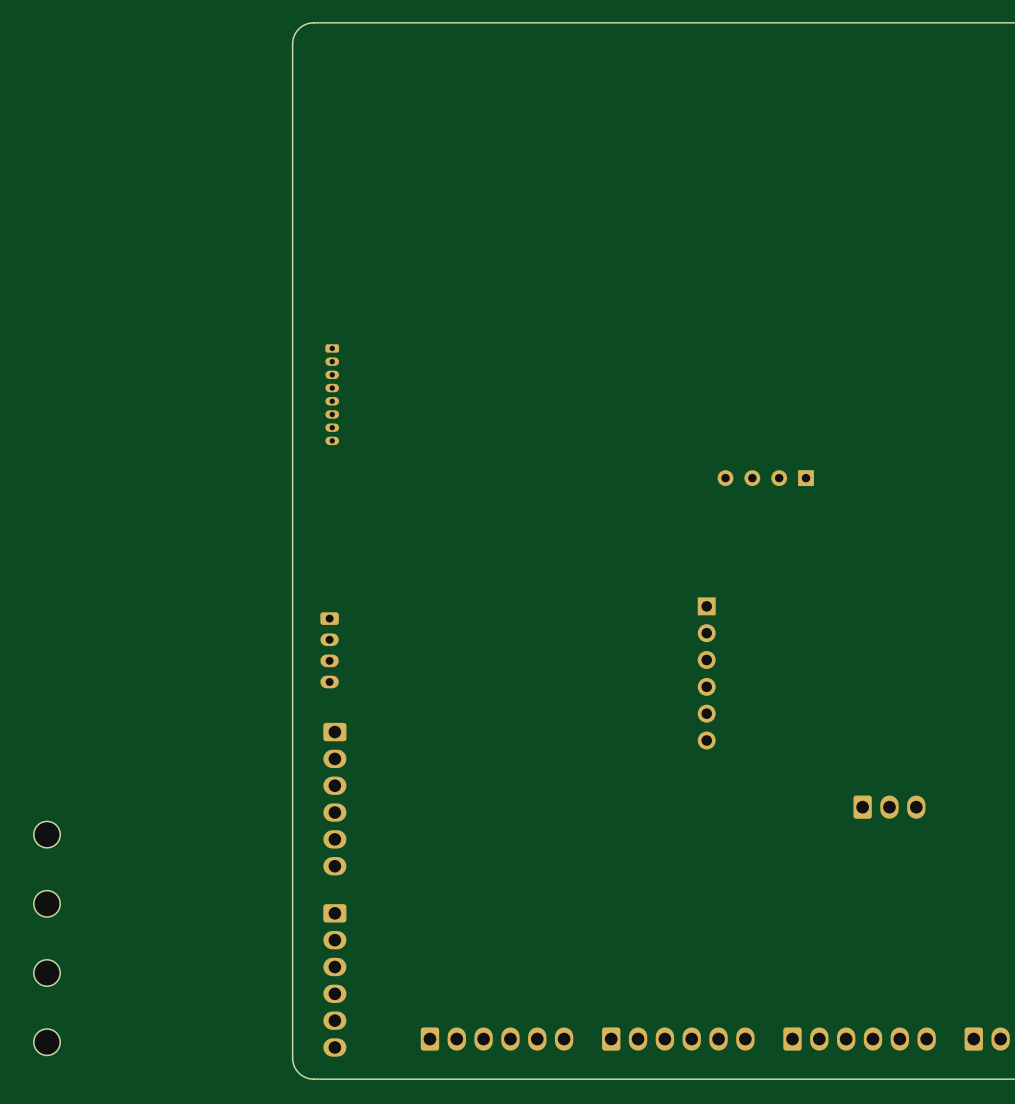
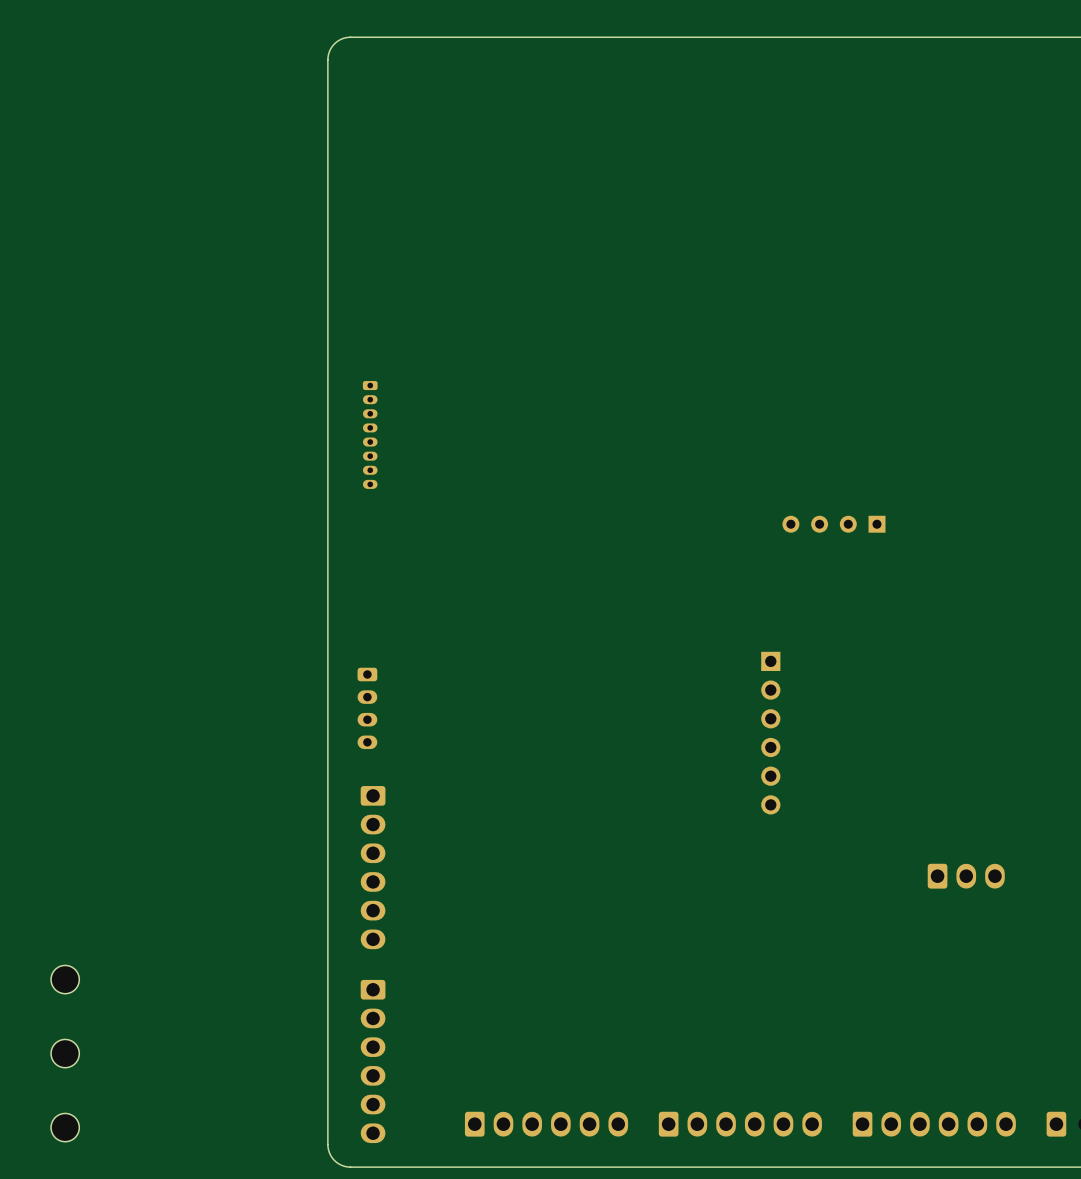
part: (47, 834) -> none

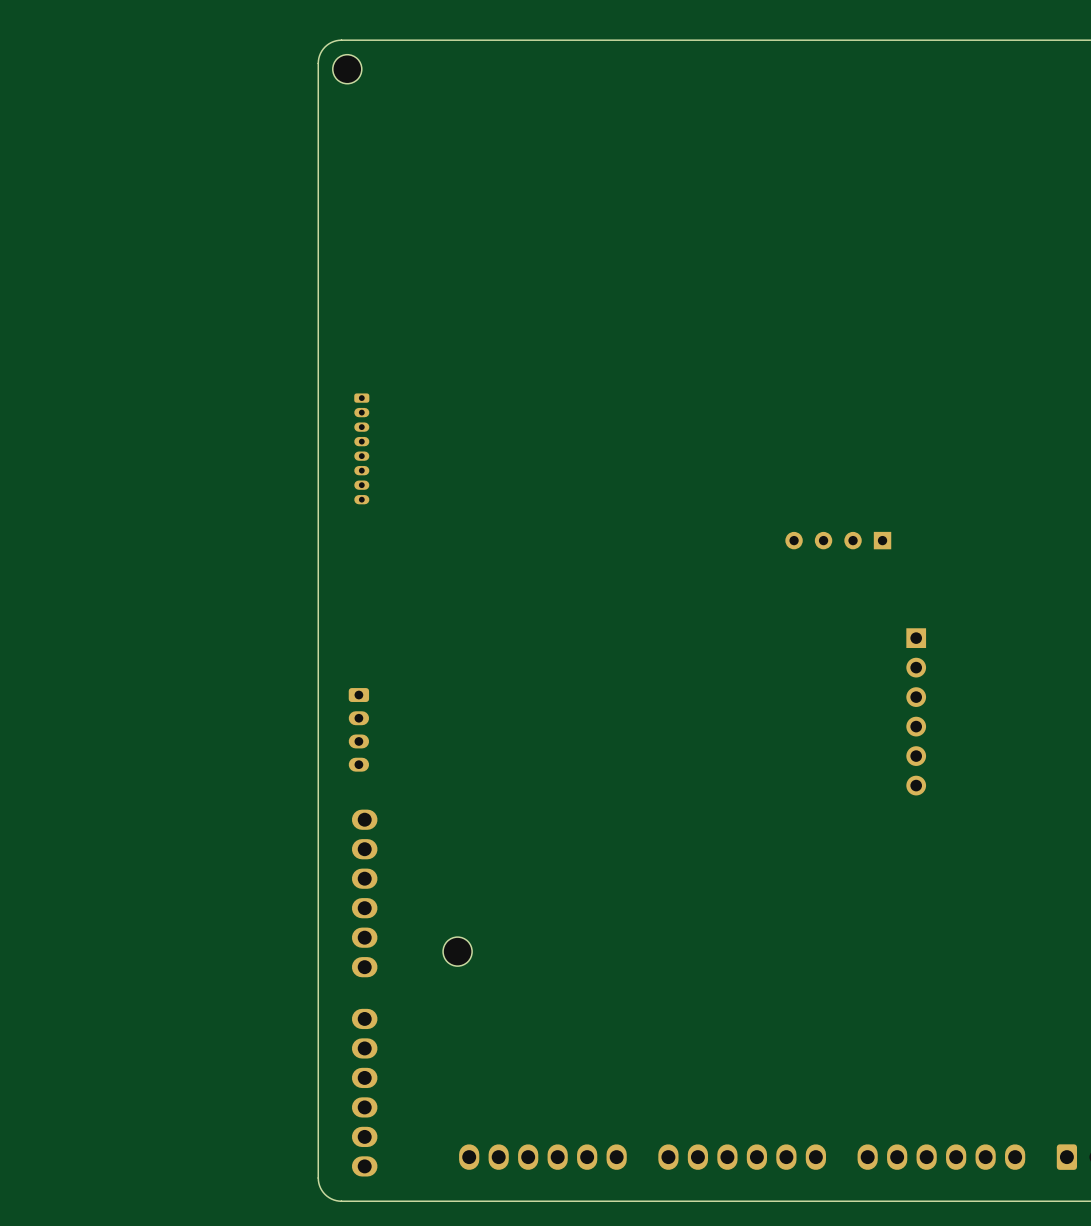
part: none -> (347, 69)
part position: (770, 733) -> (916, 711)
part footprint: [360, 786, 386, 950] -> [351, 809, 378, 978]
part: (966, 876) -> none
part: none -> (457, 951)
part: (65, 979) -> none
part footprint: [360, 979, 386, 1144] -> [351, 1008, 378, 1177]
part: (65, 1053) -> none
part footprint: [464, 1111, 629, 1137] -> [459, 1144, 627, 1170]
part footprint: [658, 1111, 822, 1137] -> [658, 1144, 826, 1170]
part footprint: [852, 1111, 1016, 1137] -> [857, 1144, 1026, 1170]
part: (65, 1127) -> none

